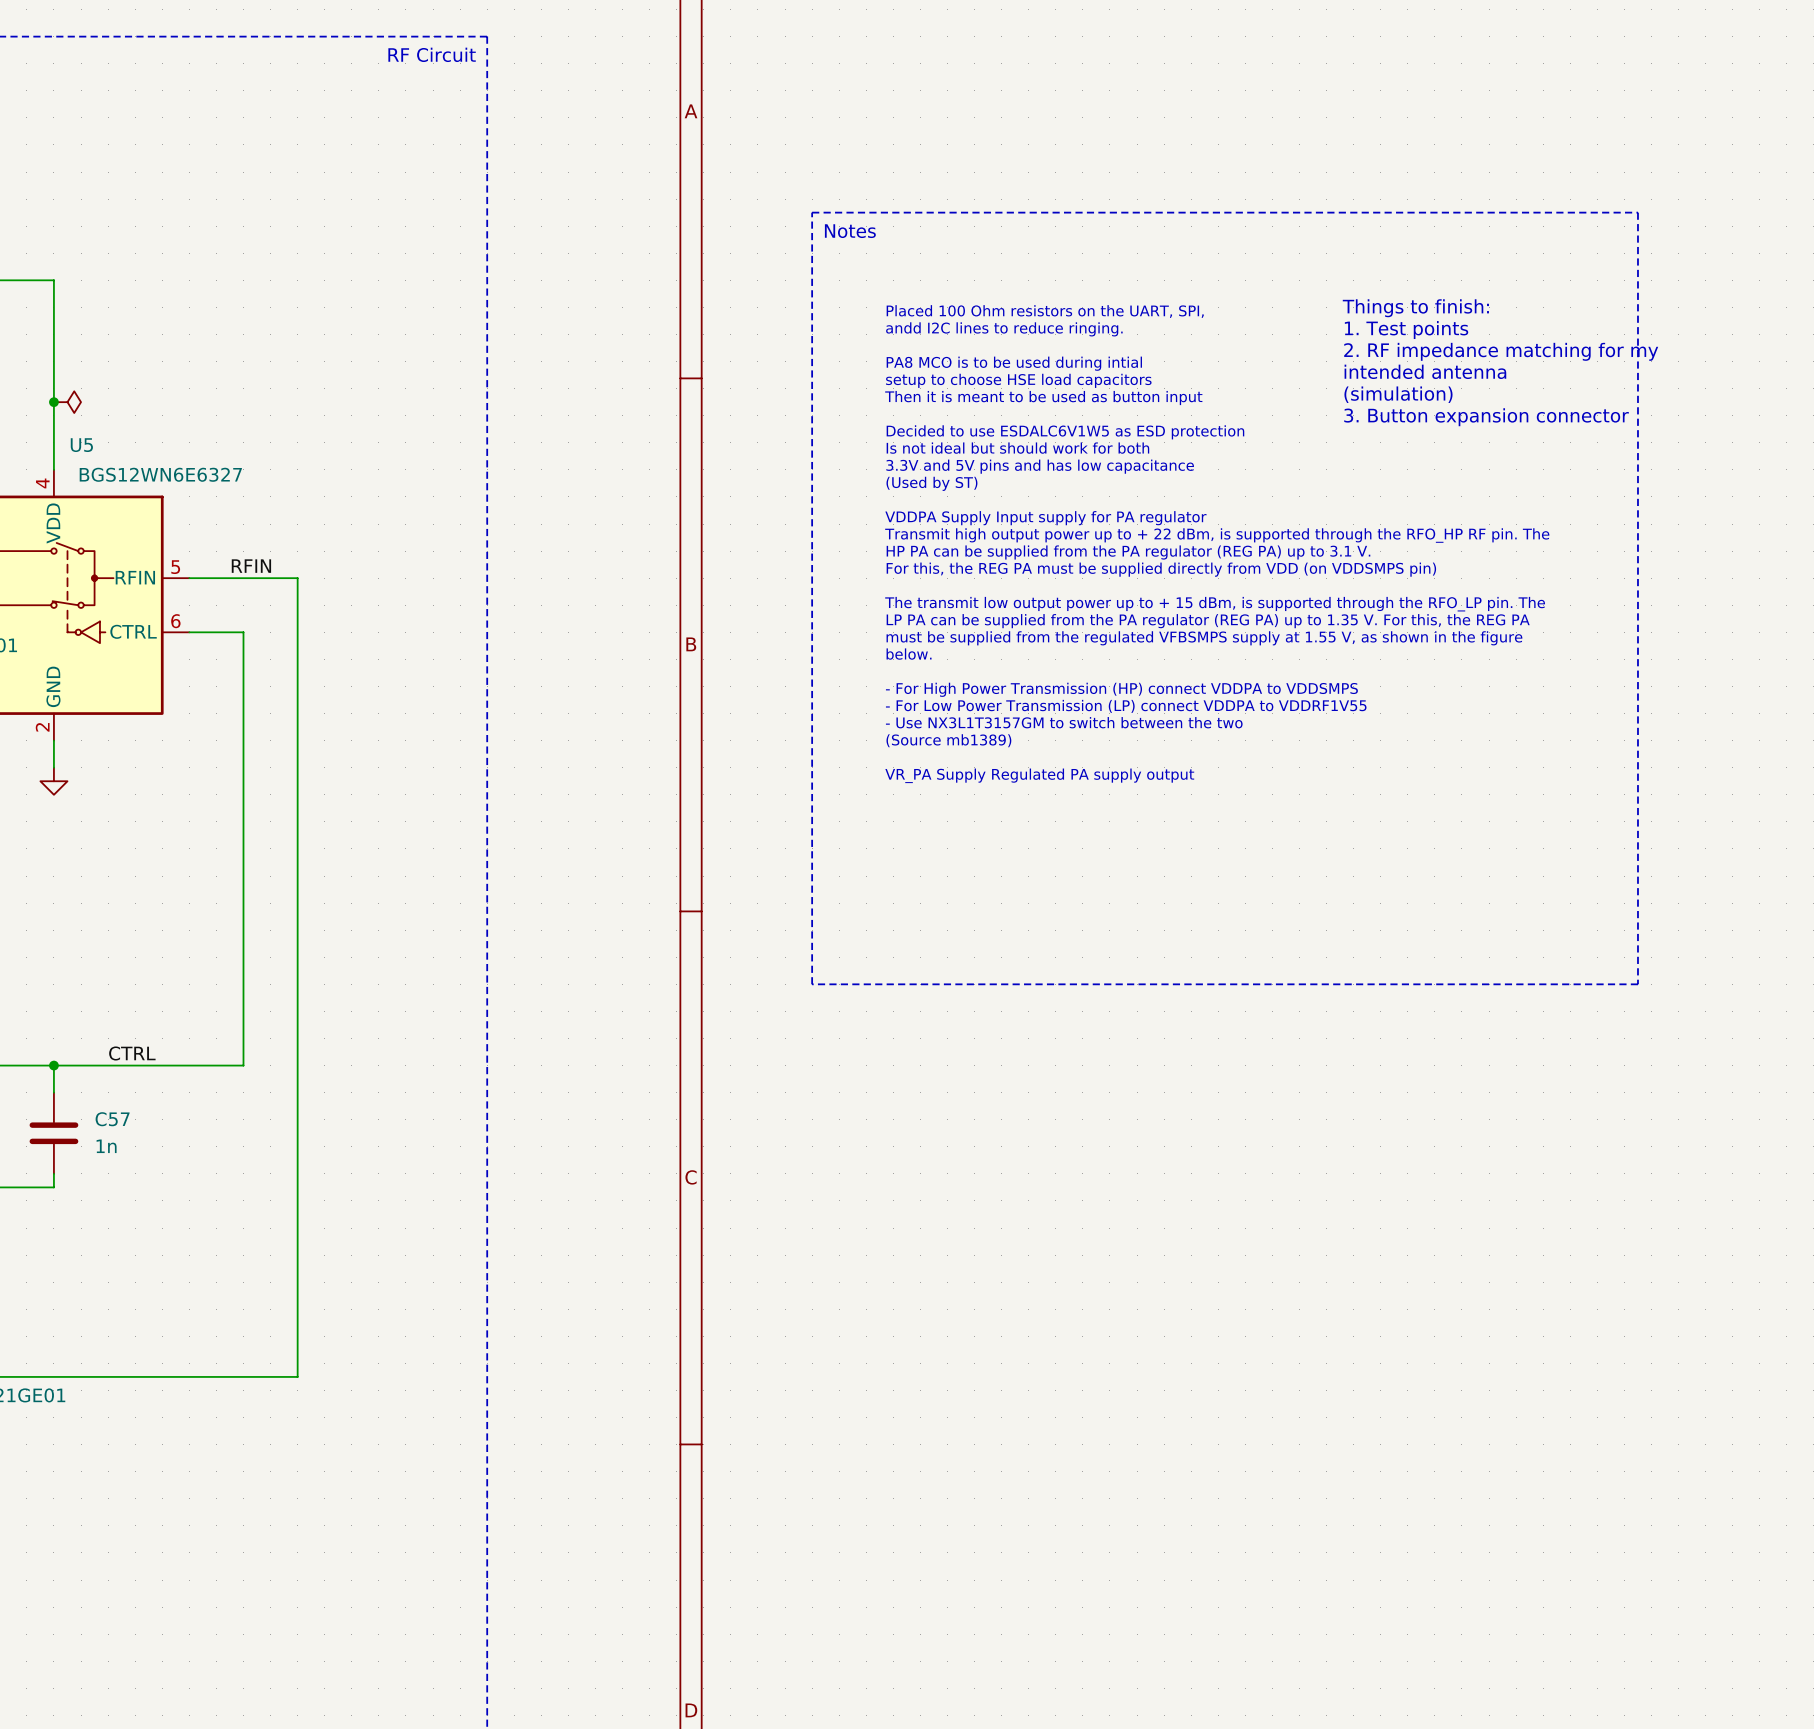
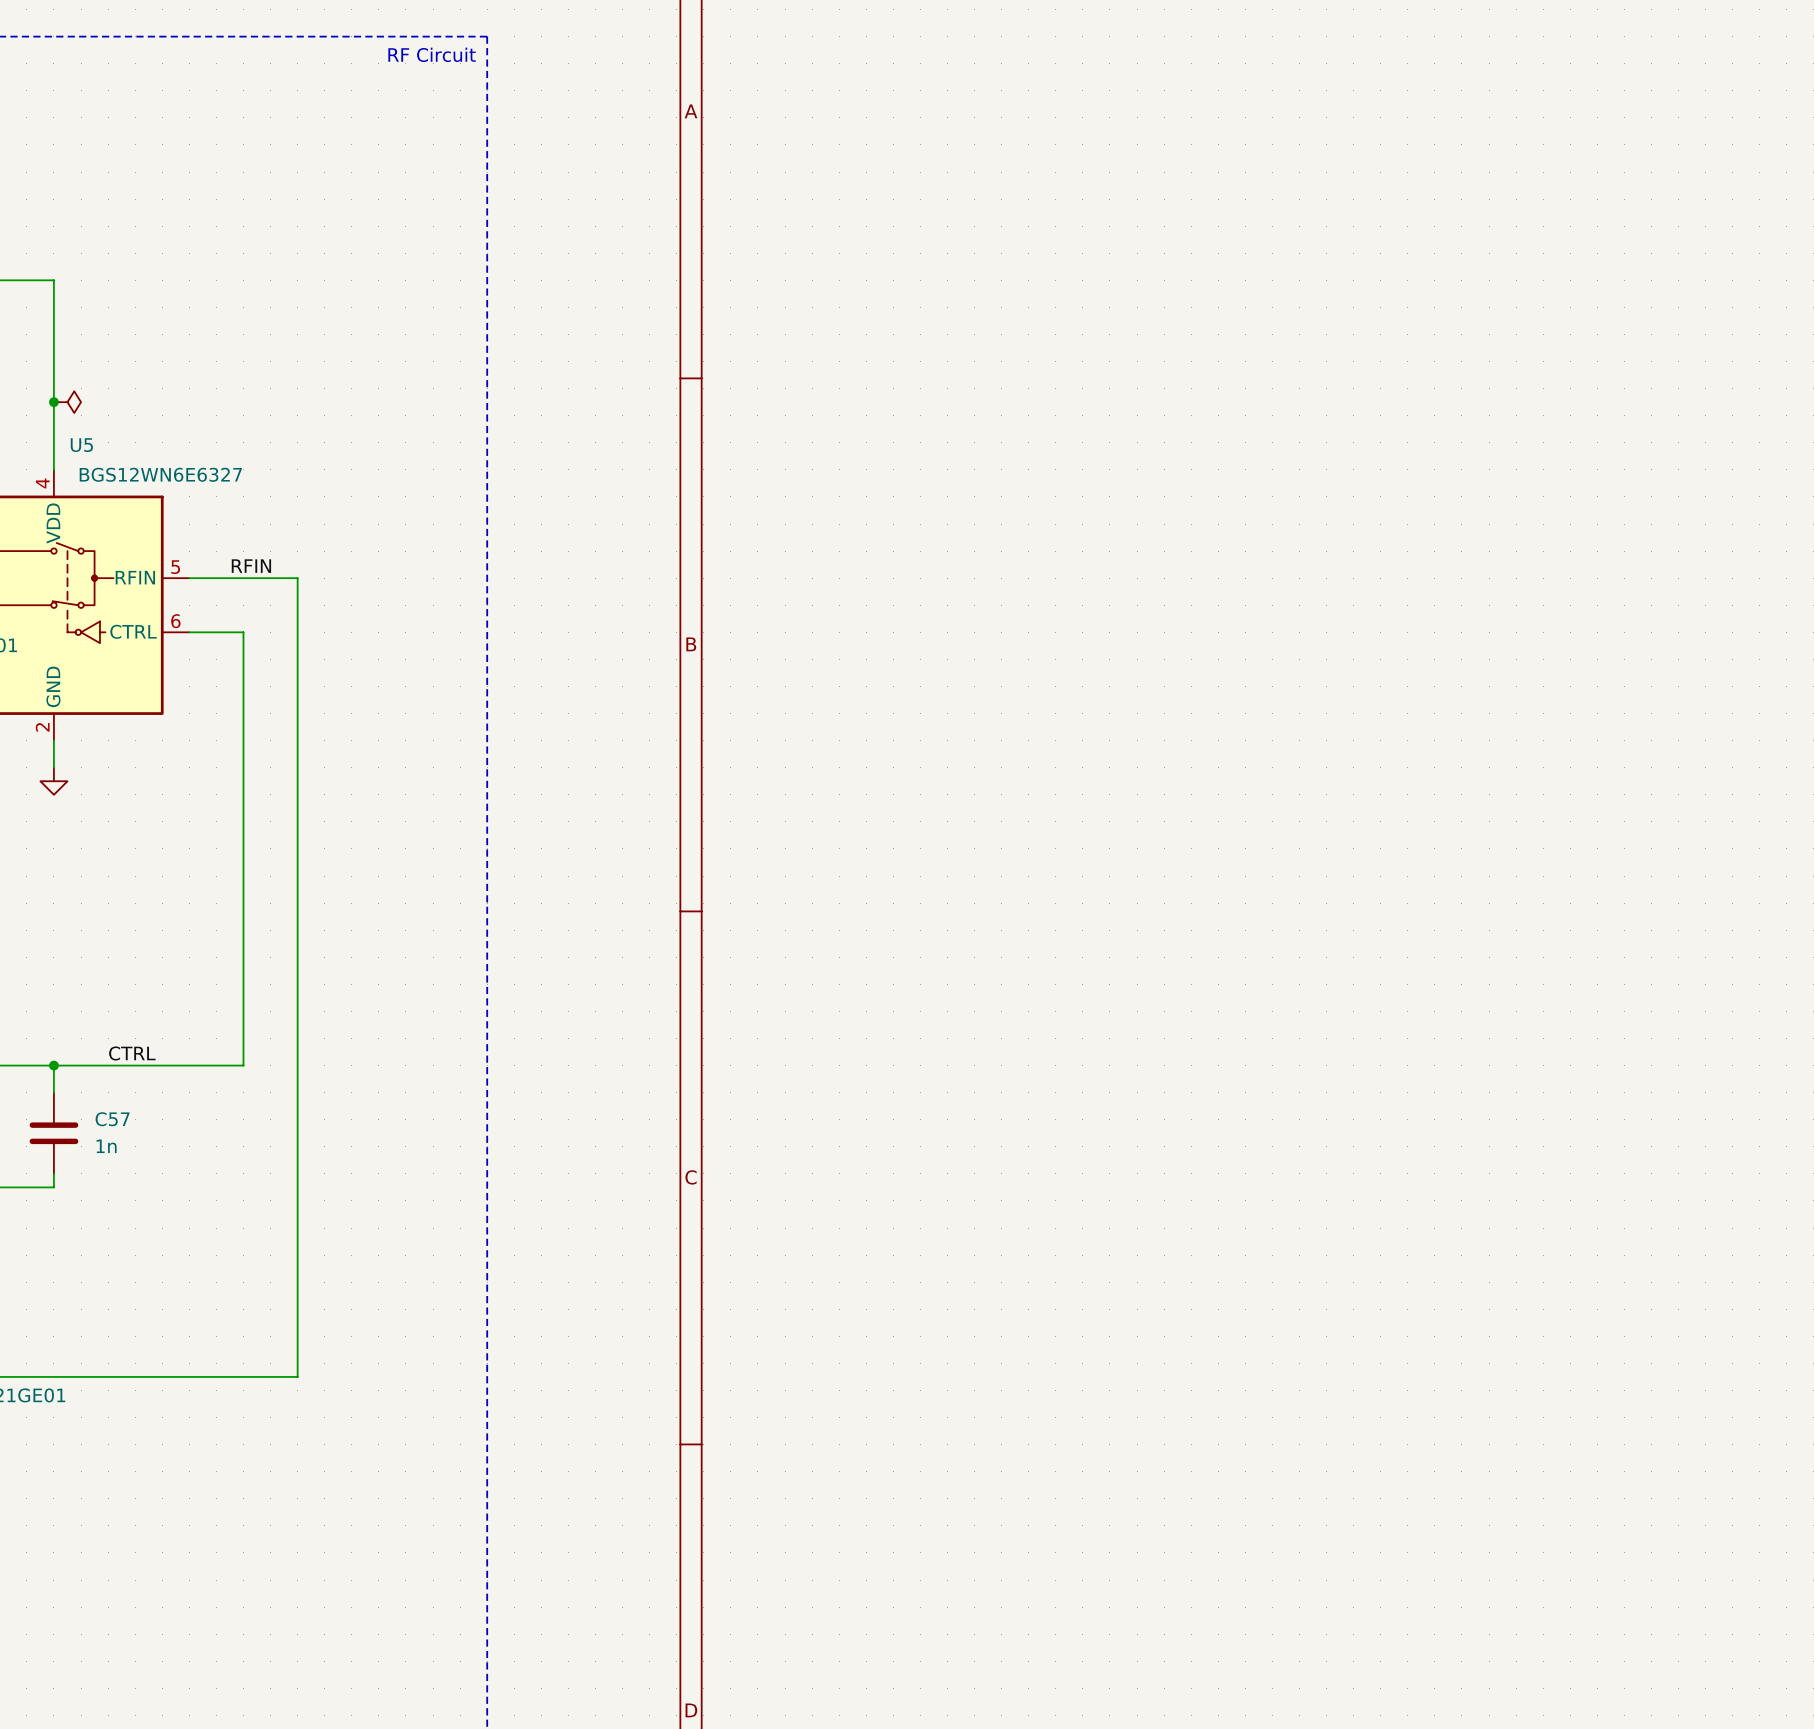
line: (812, 212) (1637, 212) (1637, 984) (812, 984) (812, 212) -> none
text: Notes (850, 231) -> none
text: Things to finish: (1415, 308) -> none
text: Placed 100 Ohm resistors on the UART, SPI, (1045, 311) -> none
text: andd I2C lines to reduce ringing. (1004, 329) -> none
text: 1. Test points (1406, 330) -> none
text: 2. RF impedance matching for my (1501, 351) -> none
text: PA8 MCO is to be used during intial (1014, 363) -> none
text: intended antenna (1425, 371) -> none
text: setup to choose HSE load capacitors (1018, 380) -> none
text: (simulation) (1398, 394) -> none
text: Then it is meant to be used as button input (1043, 398) -> none
text: 3. Button expansion connector (1486, 417) -> none
text: Decided to use ESDALC6V1W5 as ESD protection (1065, 432) -> none
text: Is not ideal but should work for both (1017, 448) -> none
text: 3.3V and 5V pins and has low capacitance (1040, 466) -> none
text: (Used by ST) (931, 483) -> none
text: VDDPA Supply Input supply for PA regulator (1045, 518) -> none
text: Transmit high output power up to + 22 dBm, is supported through the RFO_HP RF pin. The (1217, 535) -> none
text: HP PA can be supplied from the PA regulator (REG PA) up to 3.1 V. (1128, 552) -> none
text: For this, the REG PA must be supplied directly from VDD (on VDDSMPS pin) (1161, 569) -> none
text: The transmit low output power up to + 15 dBm, is supported through the RFO_LP pin. The (1215, 604) -> none
text: LP PA can be supplied from the PA regulator (REG PA) up to 1.35 V. For this, the REG PA (1208, 621) -> none
text: must be supplied from the regulated VFBSMPS supply at 1.55 V, as shown in the figure (1204, 638) -> none
text: below. (909, 654) -> none
text: - For High Power Transmission (HP) connect VDDPA to VDDSMPS (1121, 689) -> none
text: - For Low Power Transmission (LP) connect VDDPA to VDDRF1V55 (1126, 706) -> none
text: - Use NX3L1T3157GM to switch between the two (1064, 722) -> none
text: (Source mb1389) (948, 740) -> none
text: VR_PA Supply Regulated PA supply output (1039, 775) -> none

